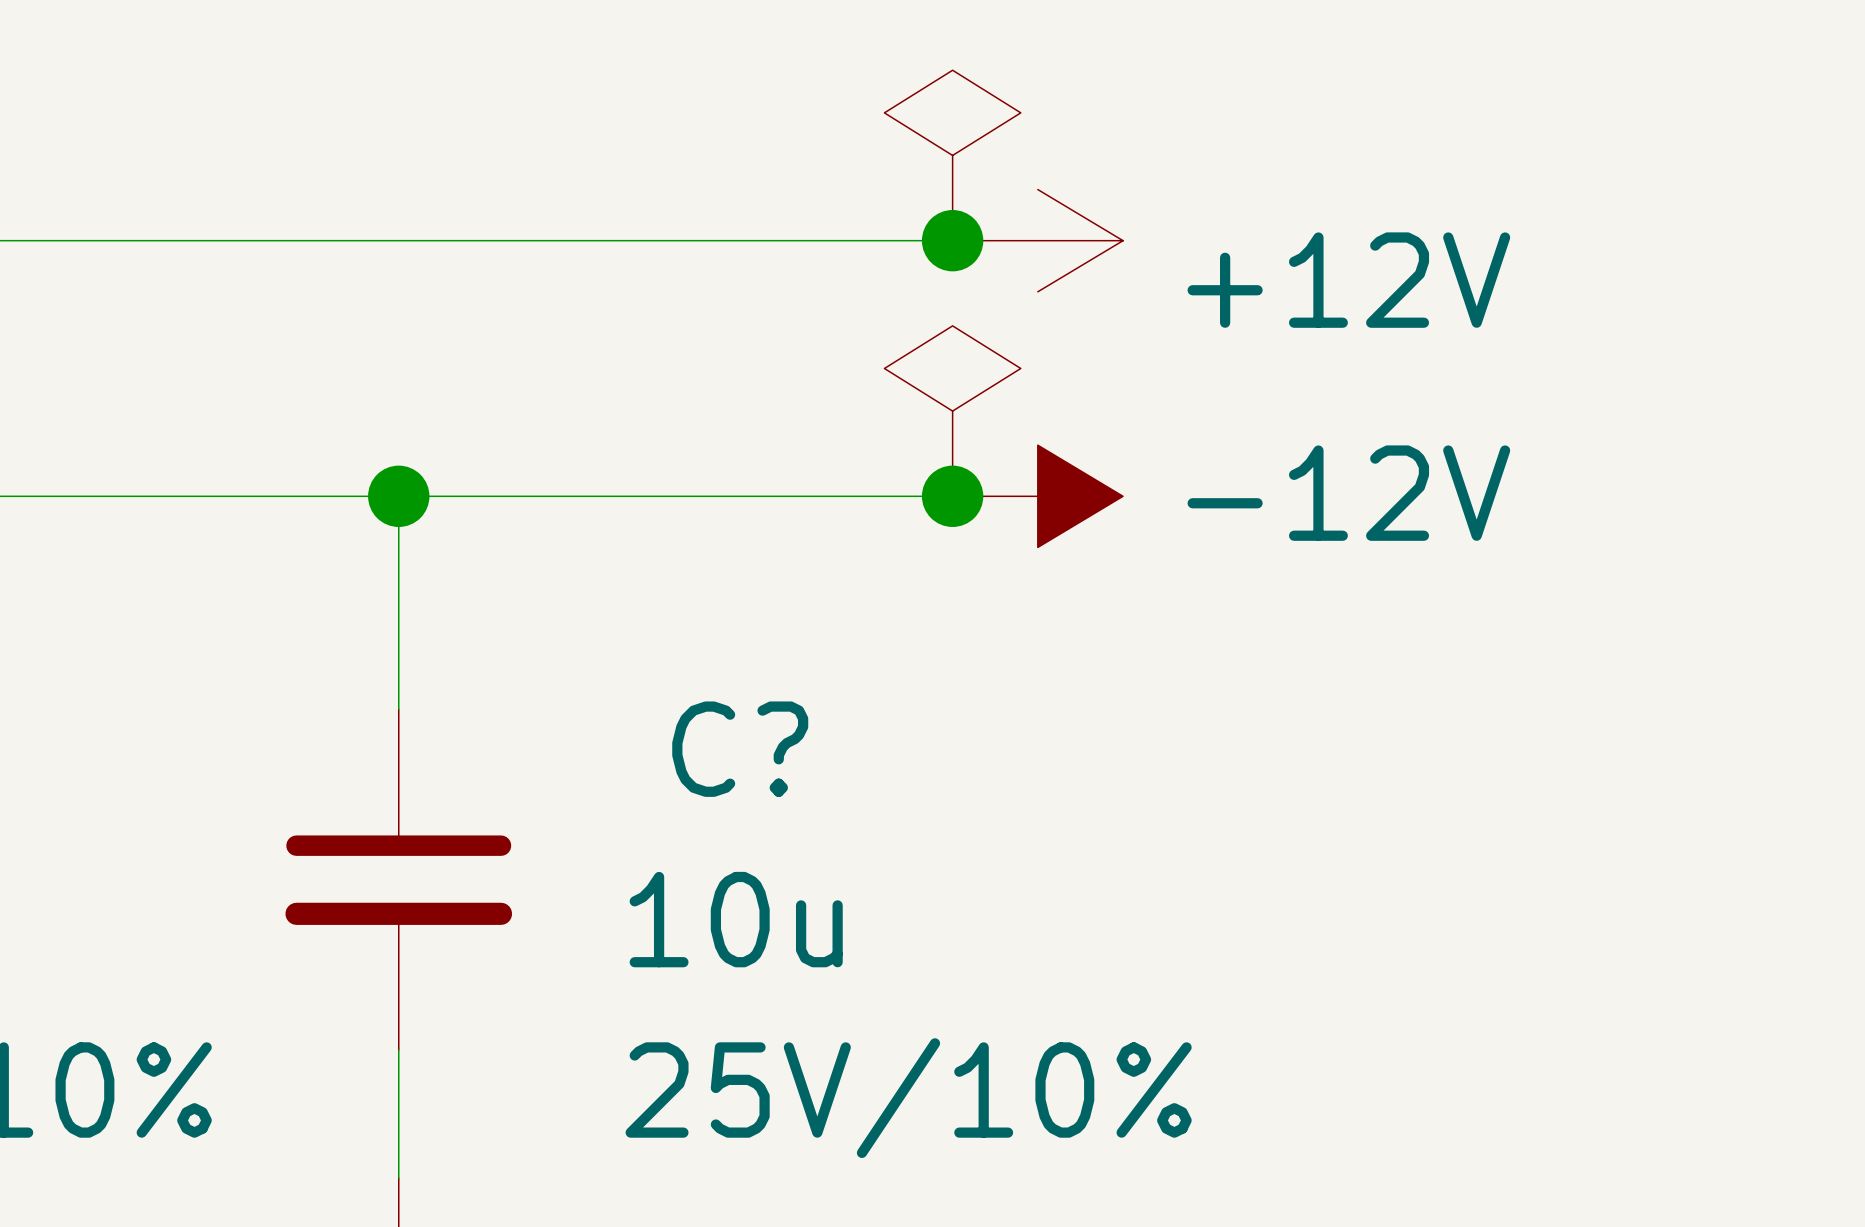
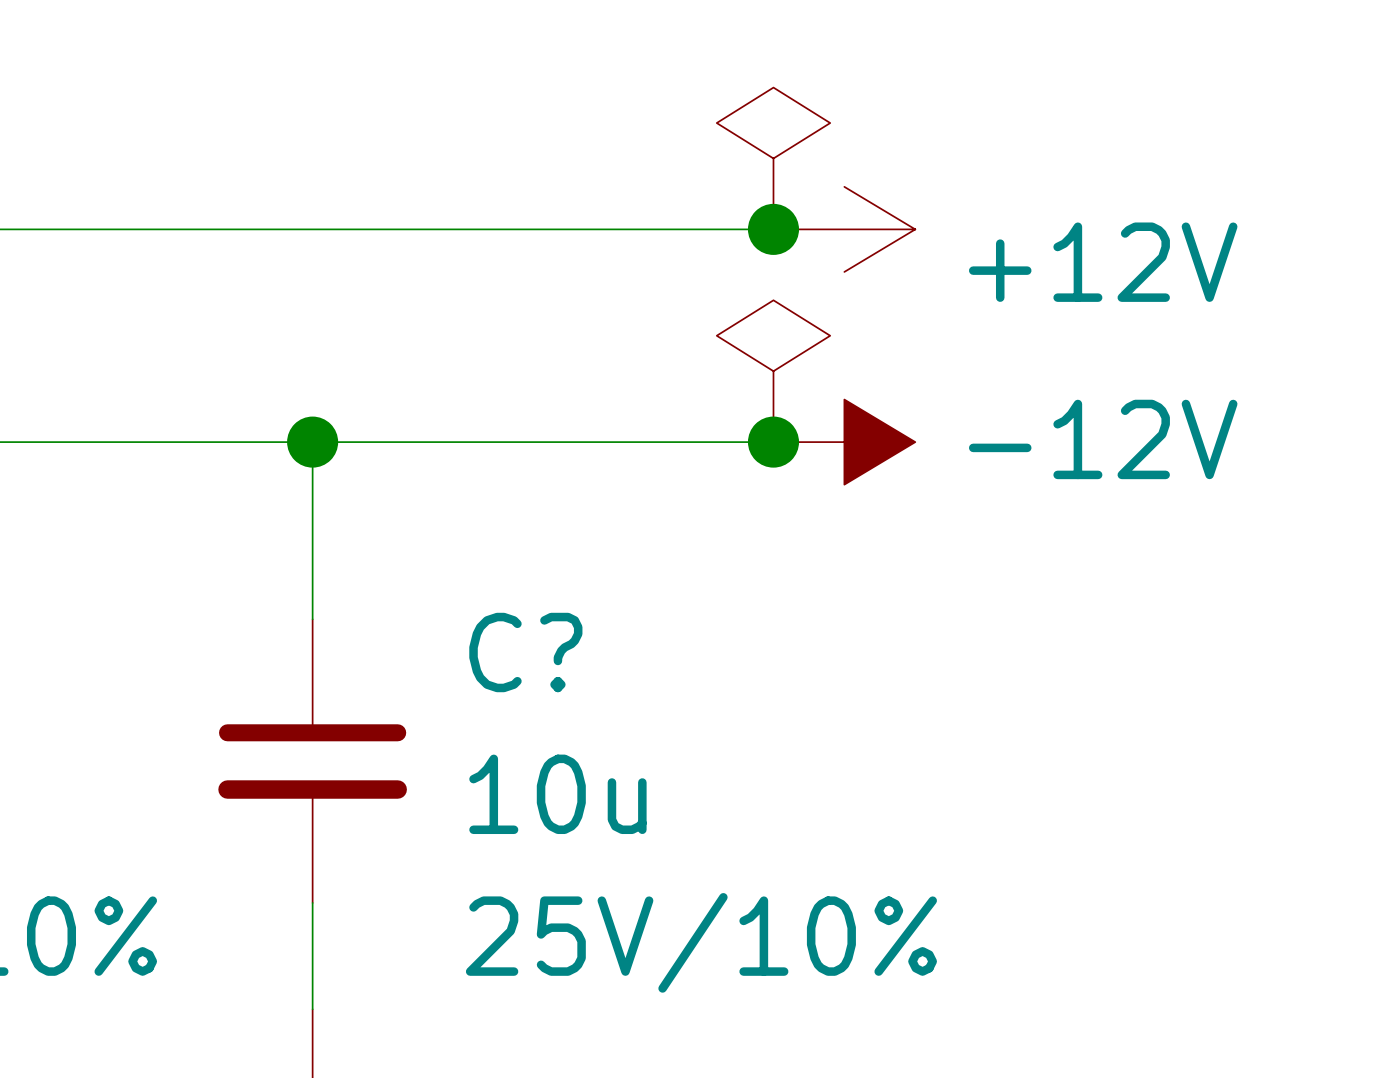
C? name position: C? (740, 749) -> C? (525, 652)
C? value position: 10u (736, 919) -> 10u (557, 794)
C? text position: 25V/10% (908, 1098) -> 25V/10% (701, 942)

